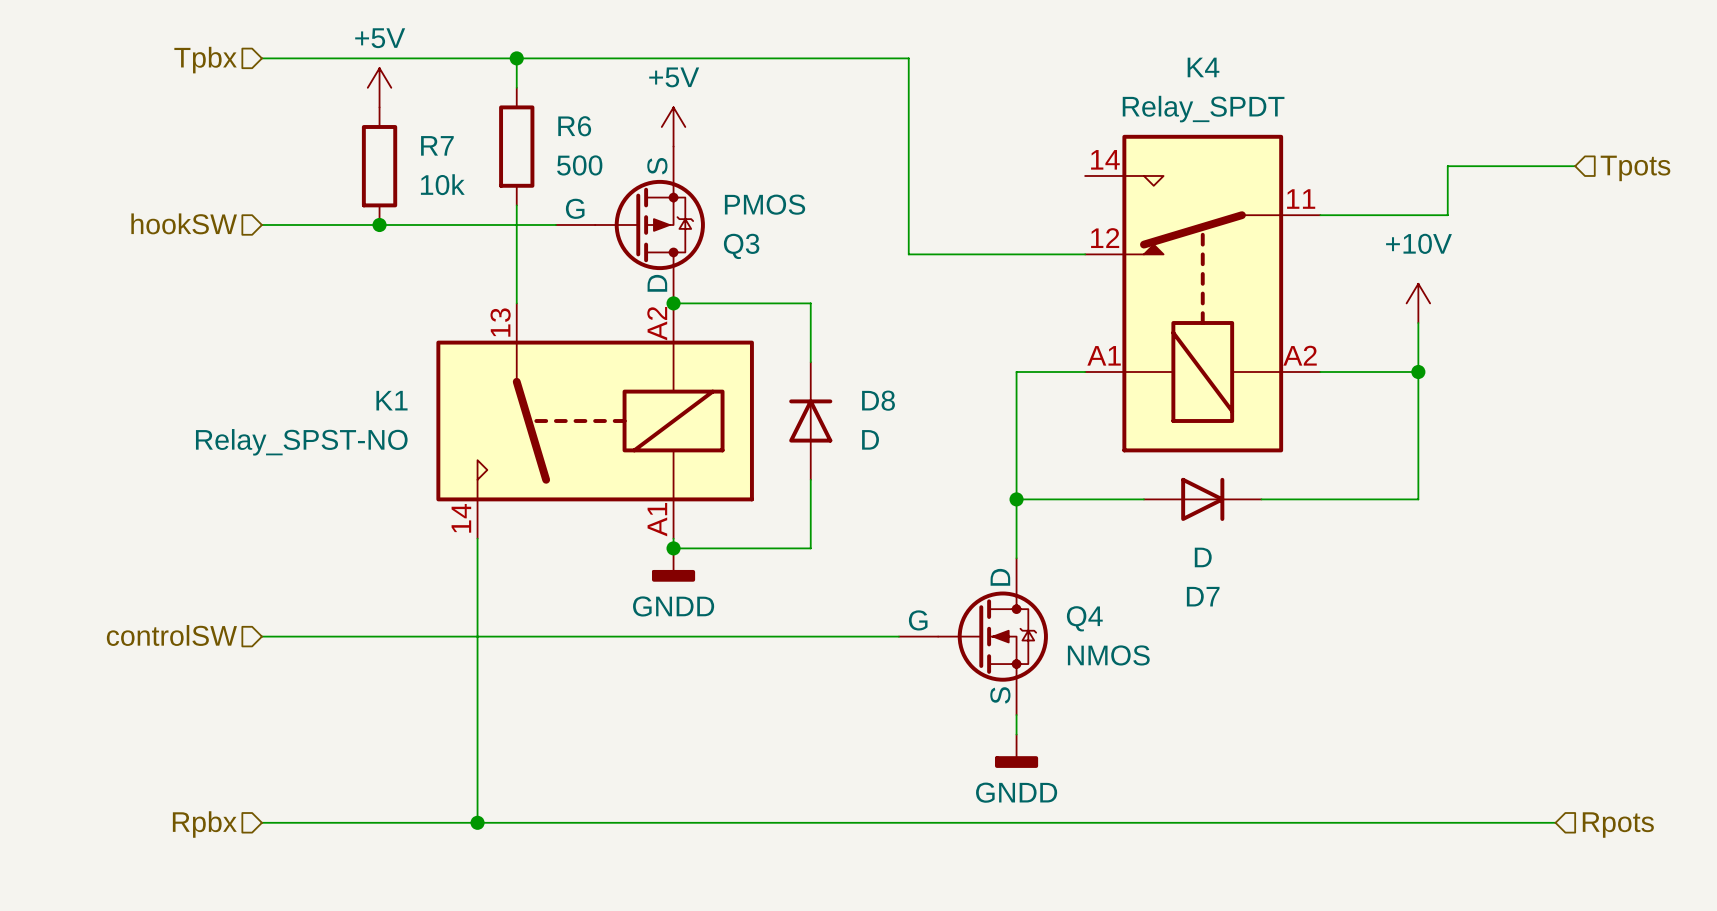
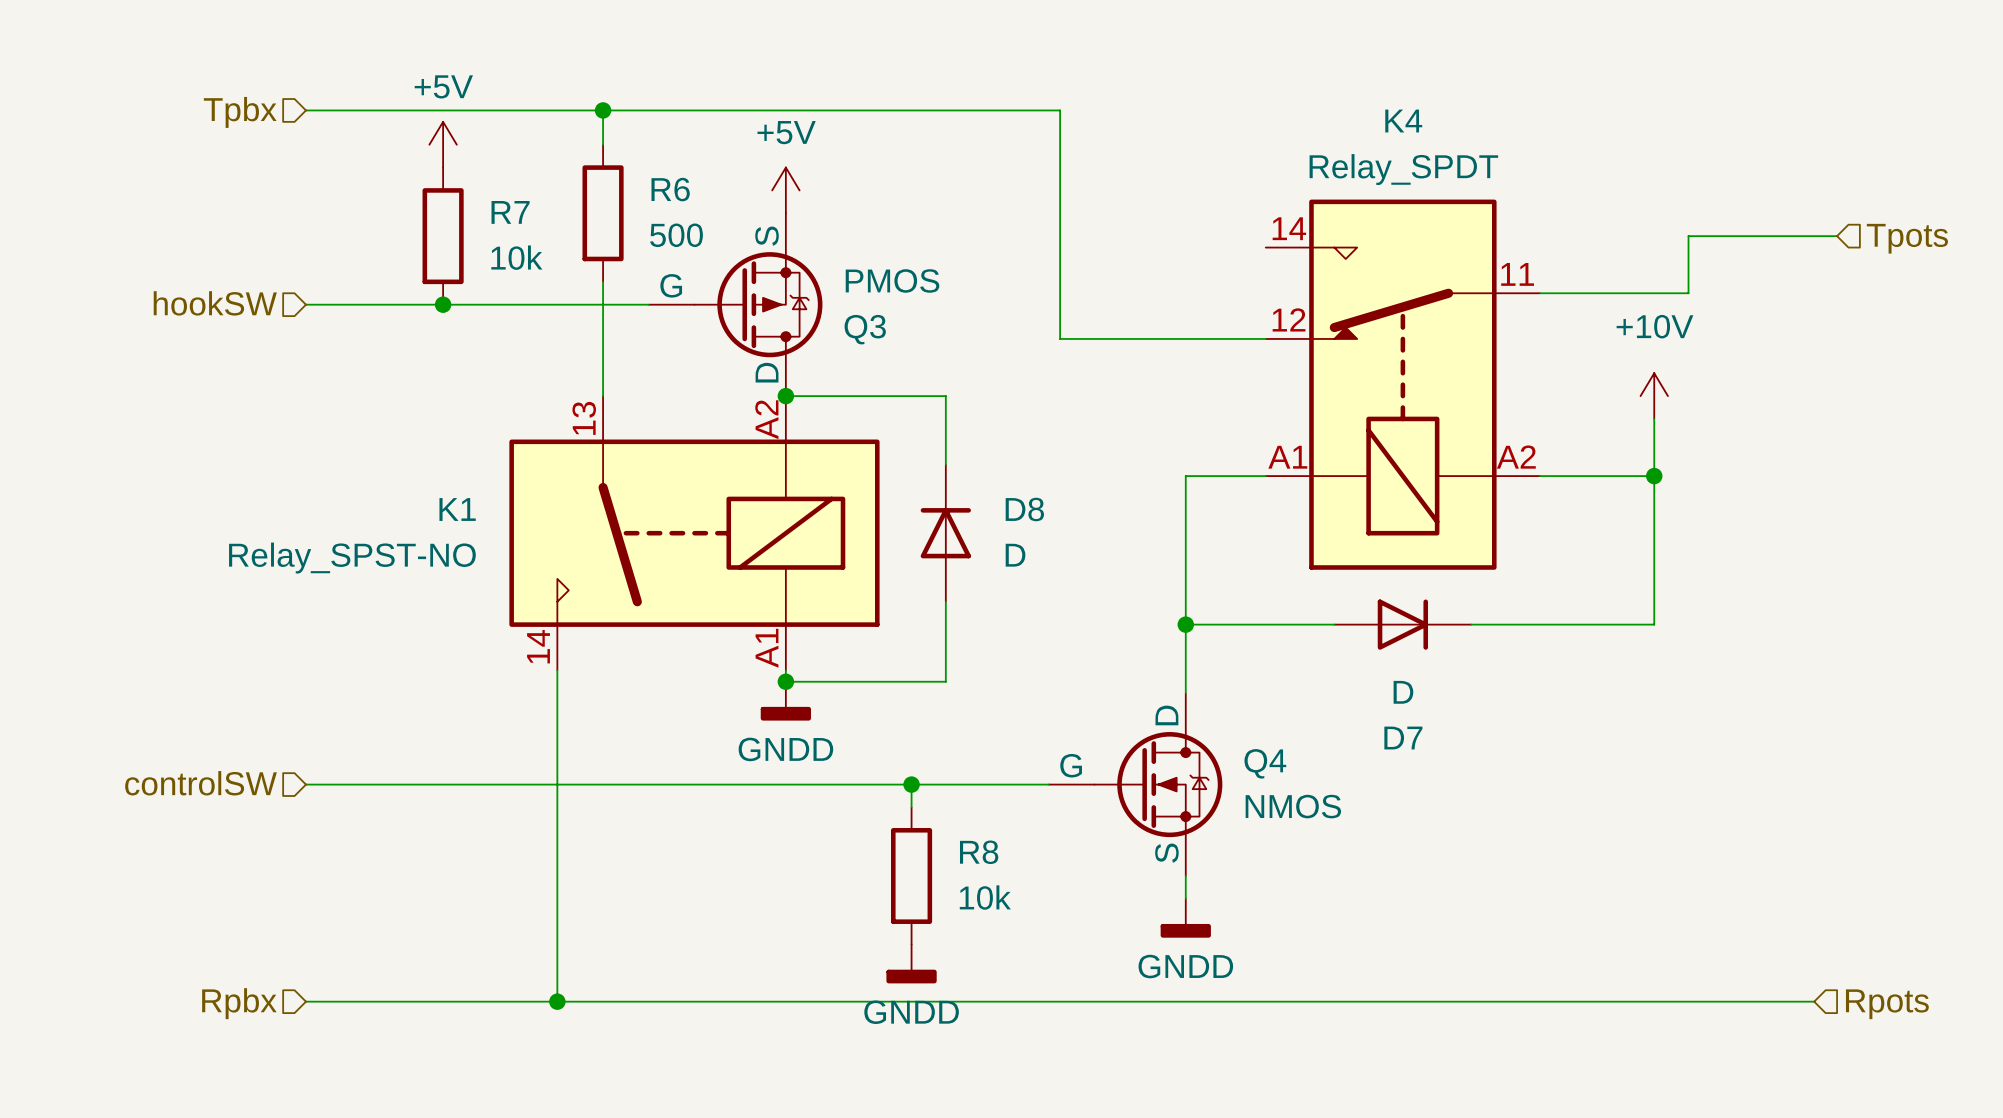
wire: none -> (911, 784) (911, 807)
junction: none -> (911, 784)
R8: none -> 10k (911, 875)
power symbol: none -> GNDD (911, 963)

